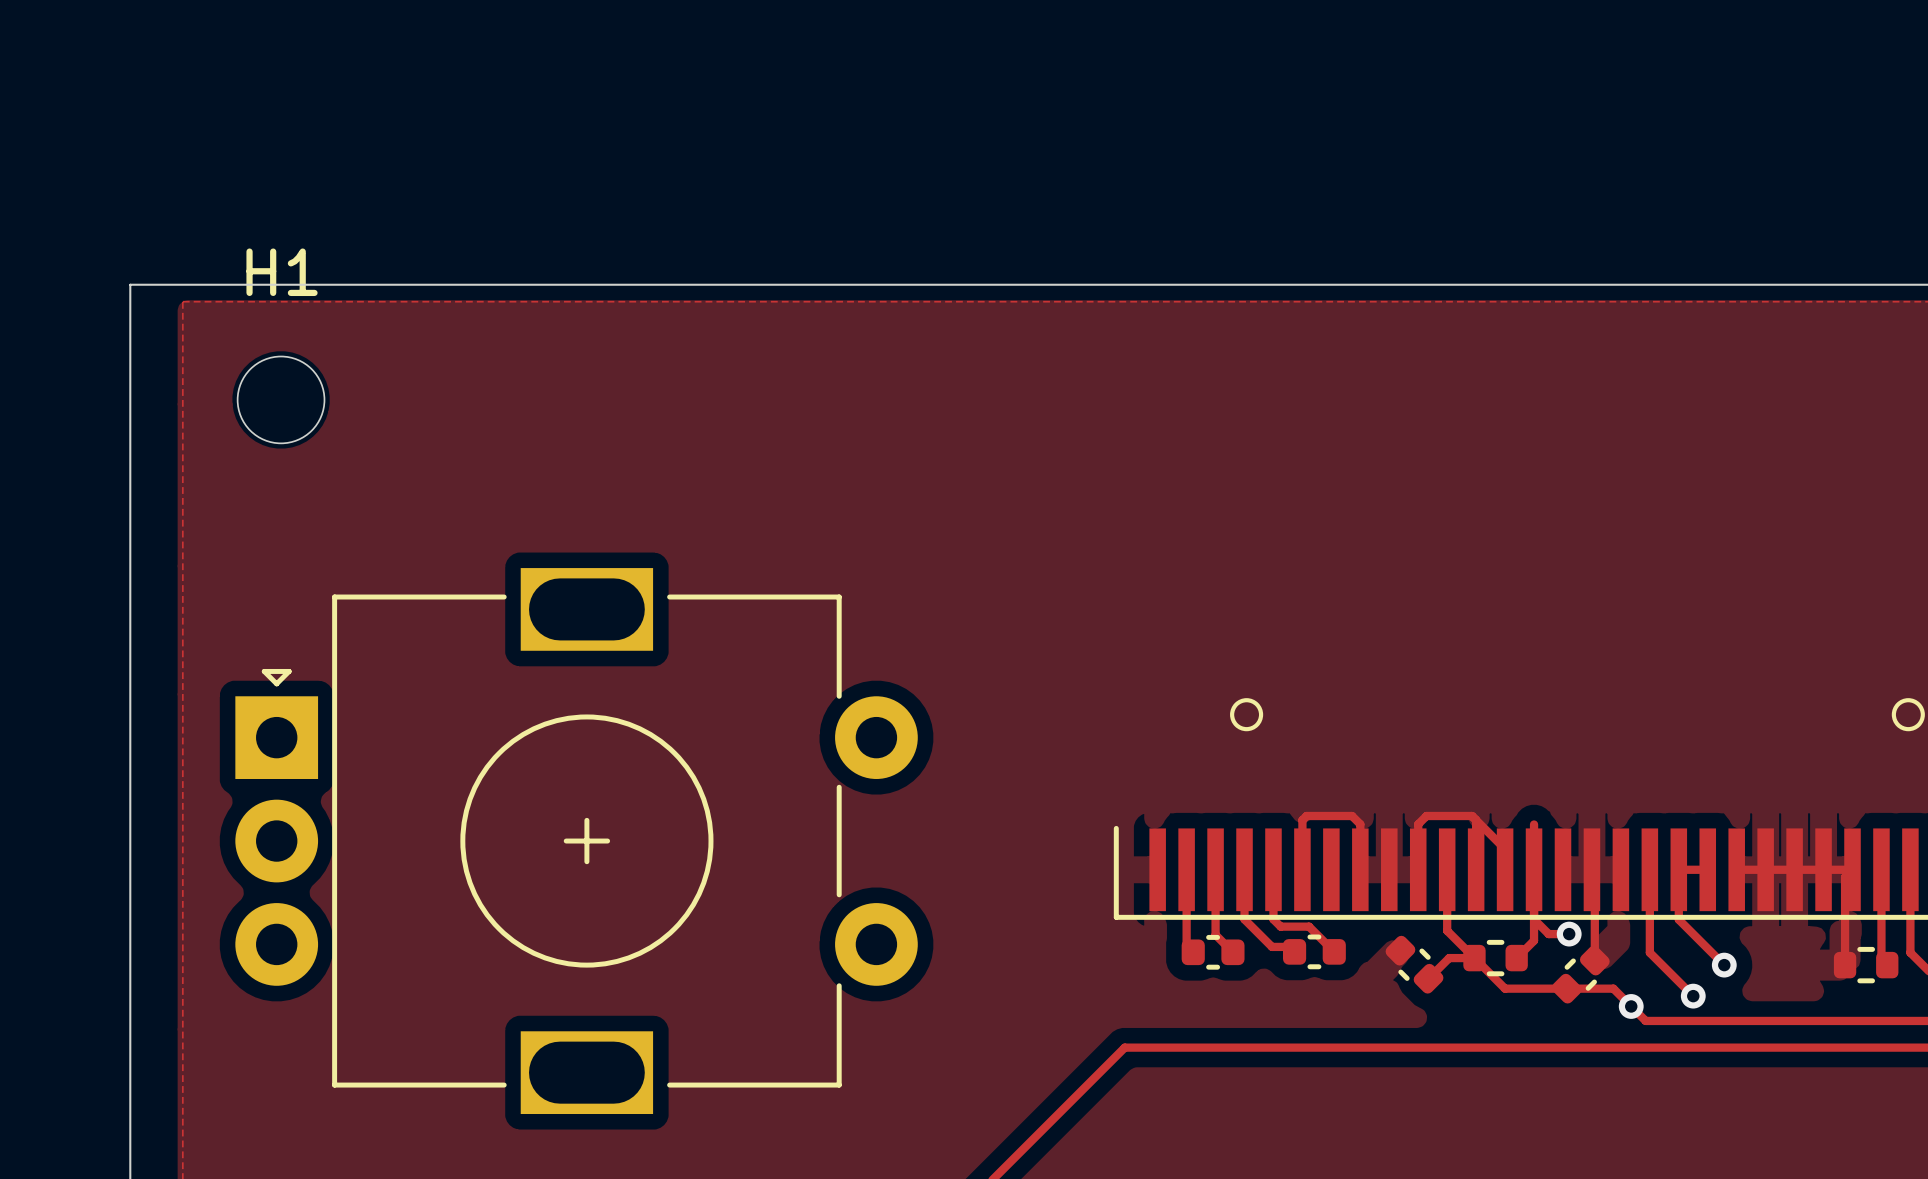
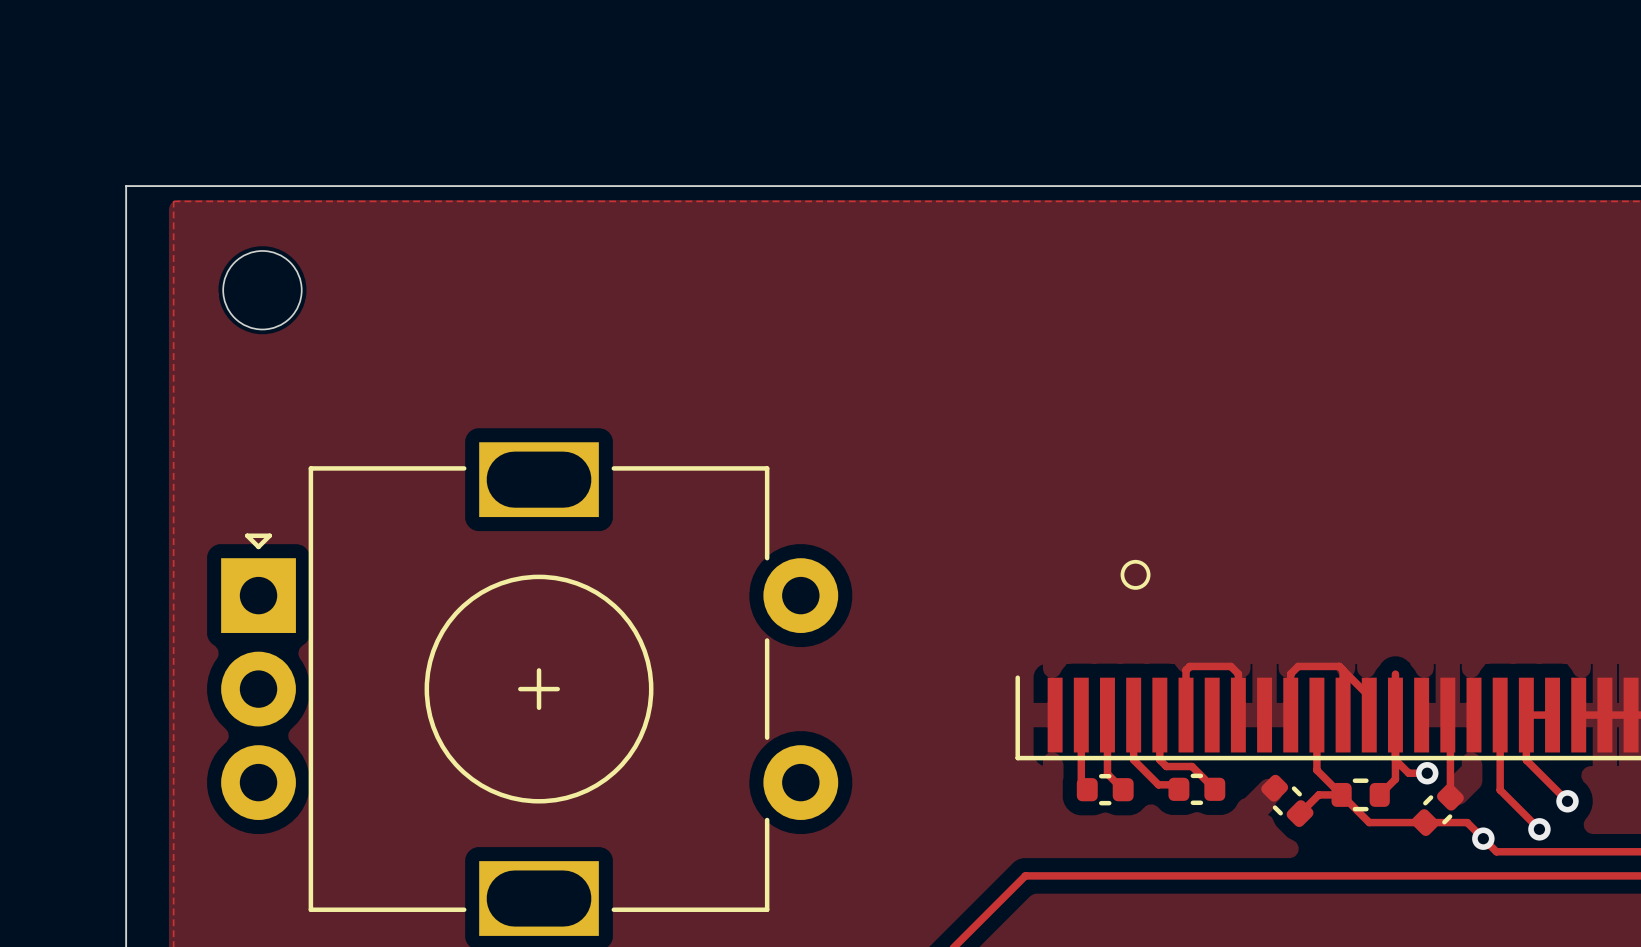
H1 name: H1 (282, 272) -> none

